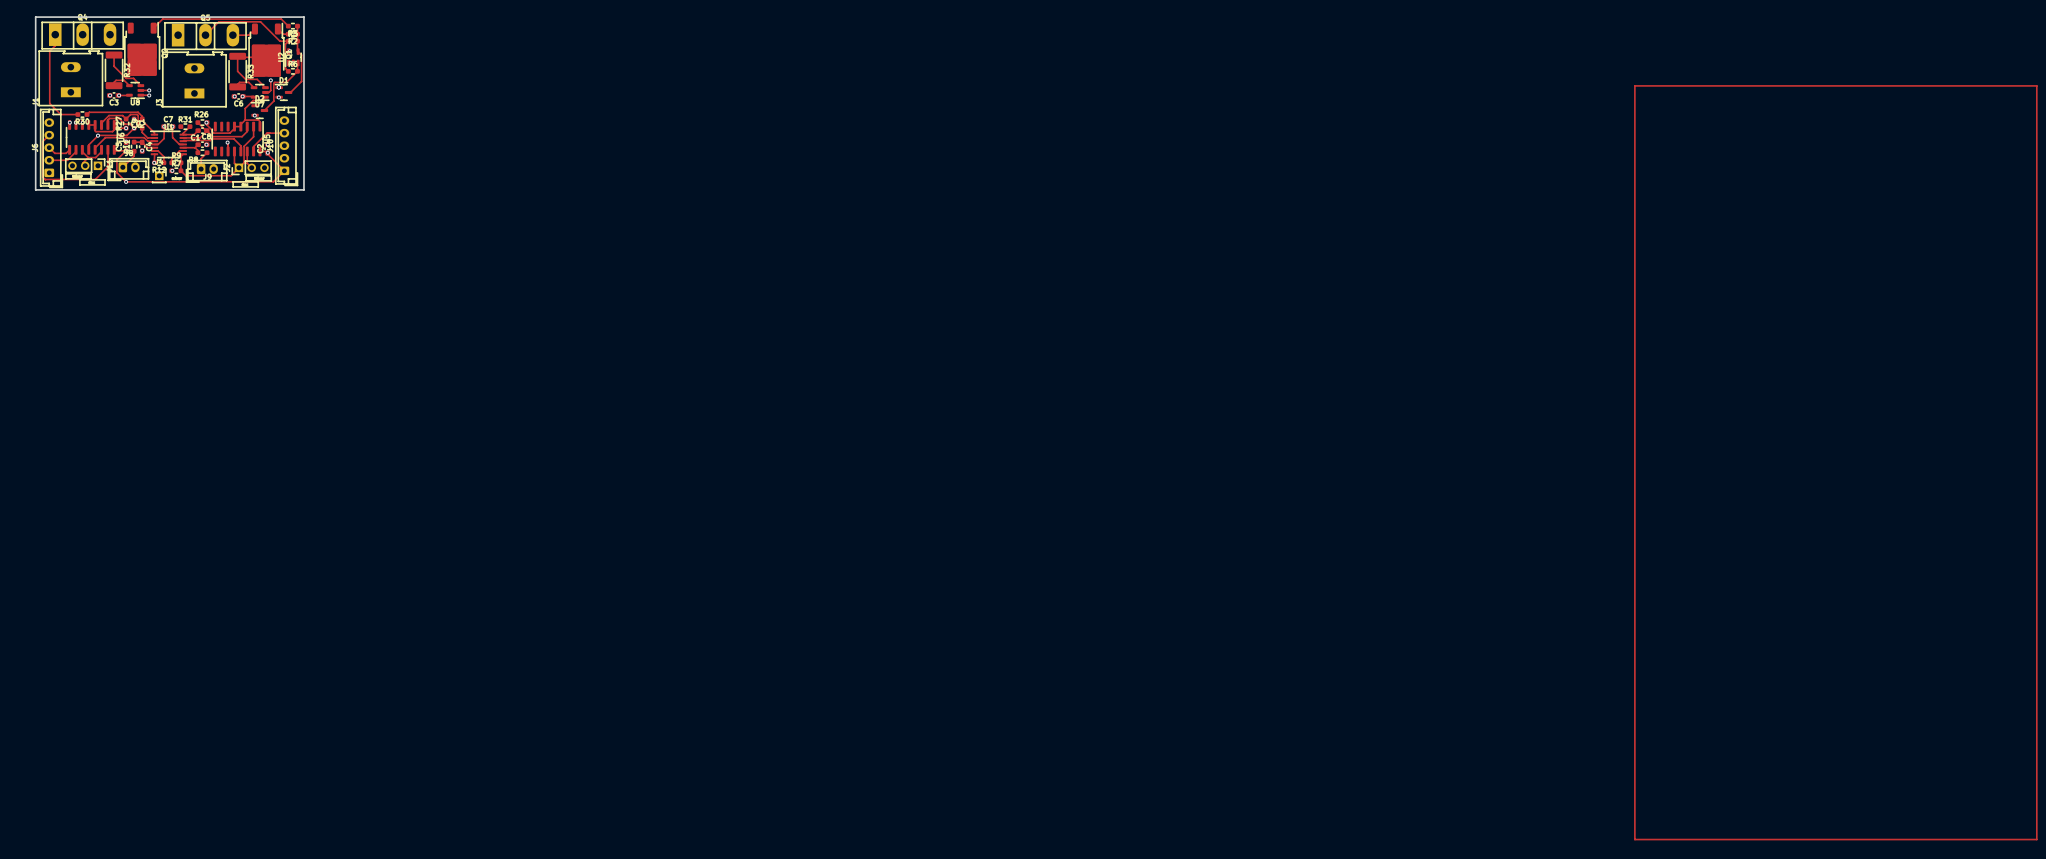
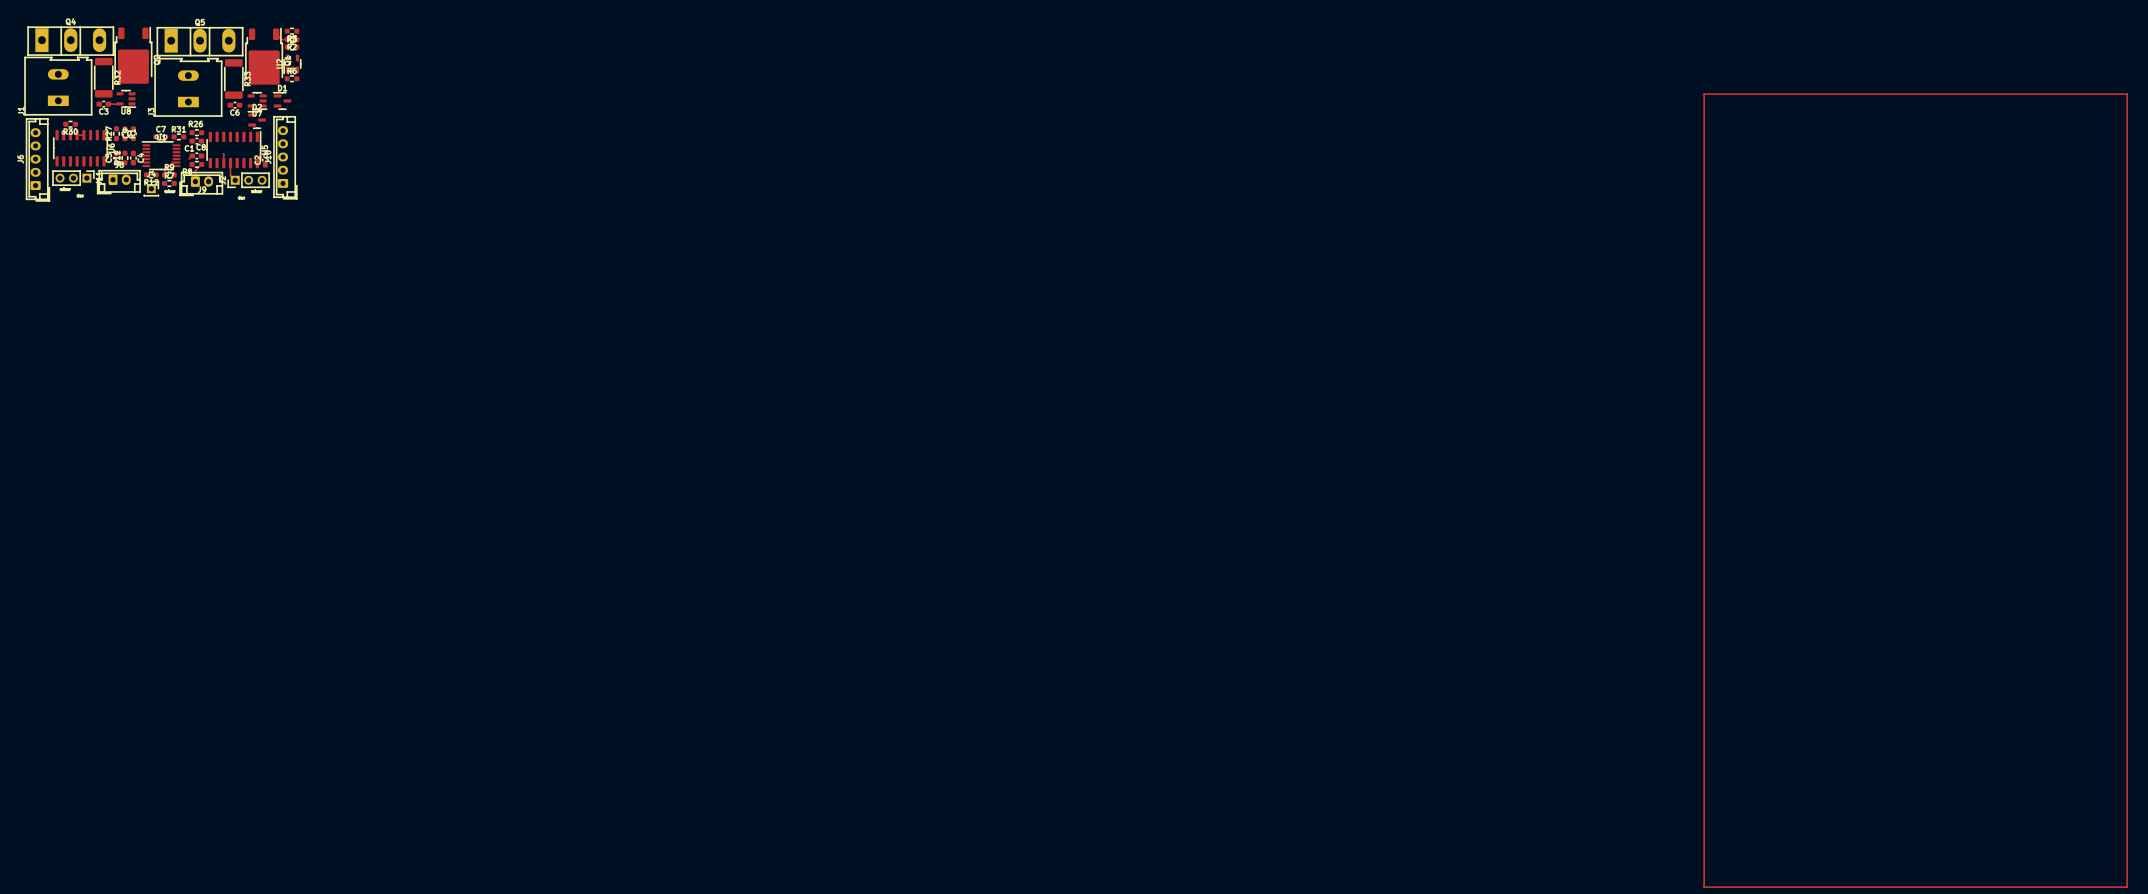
board edge: (35, 17) (303, 17) (303, 189) (35, 189) (35, 17) -> none
track: (288, 26) (281, 19) (162, 19) (153, 28) -> none
track: (297, 26) (297, 50) (301, 55) (301, 81) (288, 92) -> none
track: (254, 29) (248, 35) (232, 35) -> none
track: (55, 34) (55, 45) (49, 51) (49, 103) (60, 114) (77, 114) -> none
track: (205, 35) (218, 21) (260, 21) (279, 41) (288, 41) -> none
track: (287, 42) (285, 44) (285, 68) (288, 71) -> none
track: (114, 55) (114, 66) (126, 78) (133, 78) (140, 85) -> none
track: (266, 60) (263, 57) (237, 57) (237, 71) (245, 79) (257, 79) (265, 87) -> none
track: (298, 62) (297, 71) (286, 82) (273, 83) (273, 101) (264, 110) -> none
track: (270, 80) (270, 90) (265, 92) -> none
via: (270, 80) -> none
track: (114, 85) (116, 80) (124, 80) (129, 85) -> none
track: (237, 87) (239, 82) (248, 82) (254, 87) -> none
via: (278, 87) -> none
track: (140, 90) (149, 90) -> none
via: (149, 90) -> none
via: (110, 95) -> none
via: (119, 95) -> none
track: (140, 95) (149, 95) -> none
via: (149, 95) -> none
via: (234, 96) -> none
track: (242, 96) (254, 97) -> none
via: (242, 96) -> none
track: (265, 97) (262, 100) (253, 100) (245, 108) (245, 120) -> none
via: (278, 97) -> none
track: (87, 114) (89, 112) (138, 112) (142, 116) (142, 120) (154, 134) -> none
via: (254, 115) -> none
track: (245, 120) (258, 120) (259, 126) -> none
track: (245, 120) (240, 126) (234, 126) (229, 133) (213, 133) (207, 122) -> none
via: (69, 122) -> none
track: (197, 122) (206, 130) -> none
via: (206, 122) -> none
track: (95, 124) (95, 131) (112, 131) (114, 124) (117, 128) (126, 127) -> none
track: (100, 124) (109, 115) (122, 115) (126, 119) (130, 114) (137, 114) (138, 123) (142, 127) (142, 132) (147, 137) (154, 137) -> none
track: (107, 126) (109, 118) (119, 118) (124, 124) (130, 124) (134, 128) (126, 135) (99, 135) -> none
track: (163, 126) (163, 138) (158, 144) (154, 144) -> none
track: (172, 126) (172, 137) (179, 144) (183, 144) -> none
track: (189, 126) (183, 134) (194, 134) (198, 130) -> none
track: (247, 126) (247, 131) (242, 136) (212, 136) (206, 130) -> none
track: (253, 126) (253, 136) (244, 146) (244, 162) (231, 175) (185, 175) (180, 170) (180, 156) (183, 154) -> none
via: (126, 128) -> none
via: (134, 128) -> none
track: (206, 130) (200, 137) (183, 137) -> none
track: (284, 133) (267, 133) (253, 146) (253, 151) -> none
track: (49, 135) (42, 141) (42, 177) (45, 179) -> none
track: (97, 135) (88, 144) (88, 149) -> none
via: (97, 135) -> none
track: (154, 141) (147, 141) (144, 137) (105, 137) (95, 149) -> none
track: (183, 141) (233, 138) (240, 145) (240, 151) -> none
track: (134, 142) (141, 142) (147, 147) (154, 147) -> none
via: (227, 142) -> none
via: (206, 144) -> none
track: (49, 147) (54, 153) (66, 153) (69, 149) -> none
track: (183, 147) (195, 147) (197, 152) -> none
track: (76, 149) (67, 160) (49, 160) -> none
track: (82, 149) (88, 157) -> none
track: (101, 149) (95, 157) (88, 157) -> none
track: (107, 149) (108, 166) (95, 179) (45, 179) -> none
track: (114, 149) (126, 150) -> none
track: (126, 150) (116, 159) (116, 172) (126, 181) (273, 181) (284, 170) (267, 152) (259, 151) -> none
via: (142, 150) -> none
track: (154, 150) (158, 150) (163, 156) (163, 162) -> none
track: (134, 151) (134, 156) (122, 167) -> none
track: (247, 151) (247, 163) (251, 167) -> none
via: (267, 152) -> none
track: (154, 154) (154, 162) -> none
track: (88, 157) (82, 162) (82, 165) -> none
via: (154, 162) -> none
via: (172, 170) -> none
line: (65, 173) (90, 173) (90, 178) (65, 178) (65, 173) -> none
line: (246, 175) (271, 175) (271, 180) (246, 180) (246, 175) -> none
line: (79, 179) (105, 179) (105, 184) (79, 184) (79, 179) -> none
via: (126, 181) -> none
line: (233, 181) (258, 181) (258, 186) (233, 186) (233, 181) -> none

